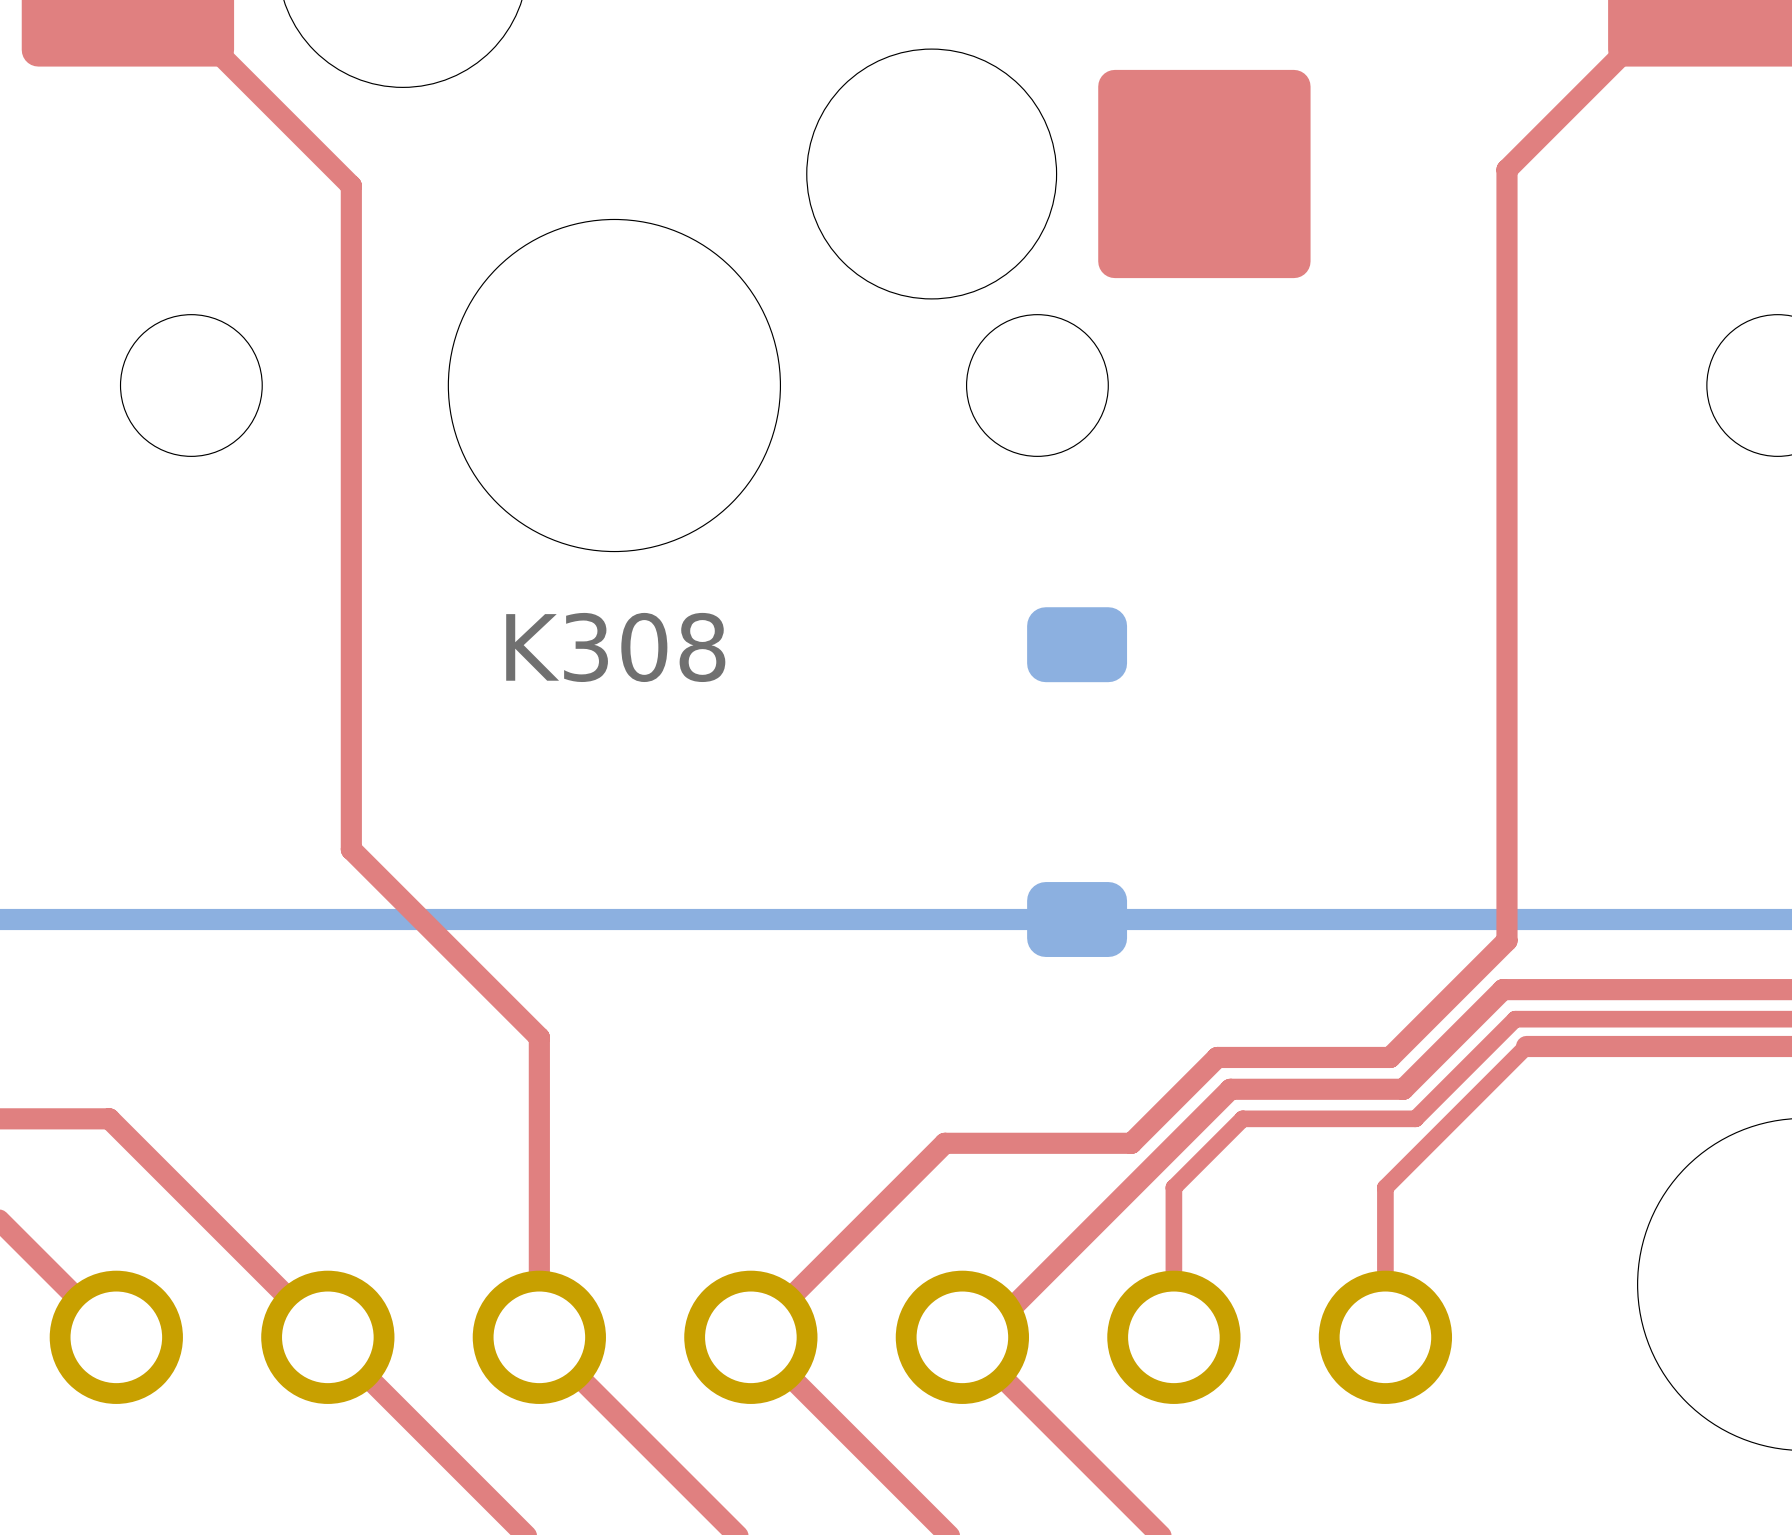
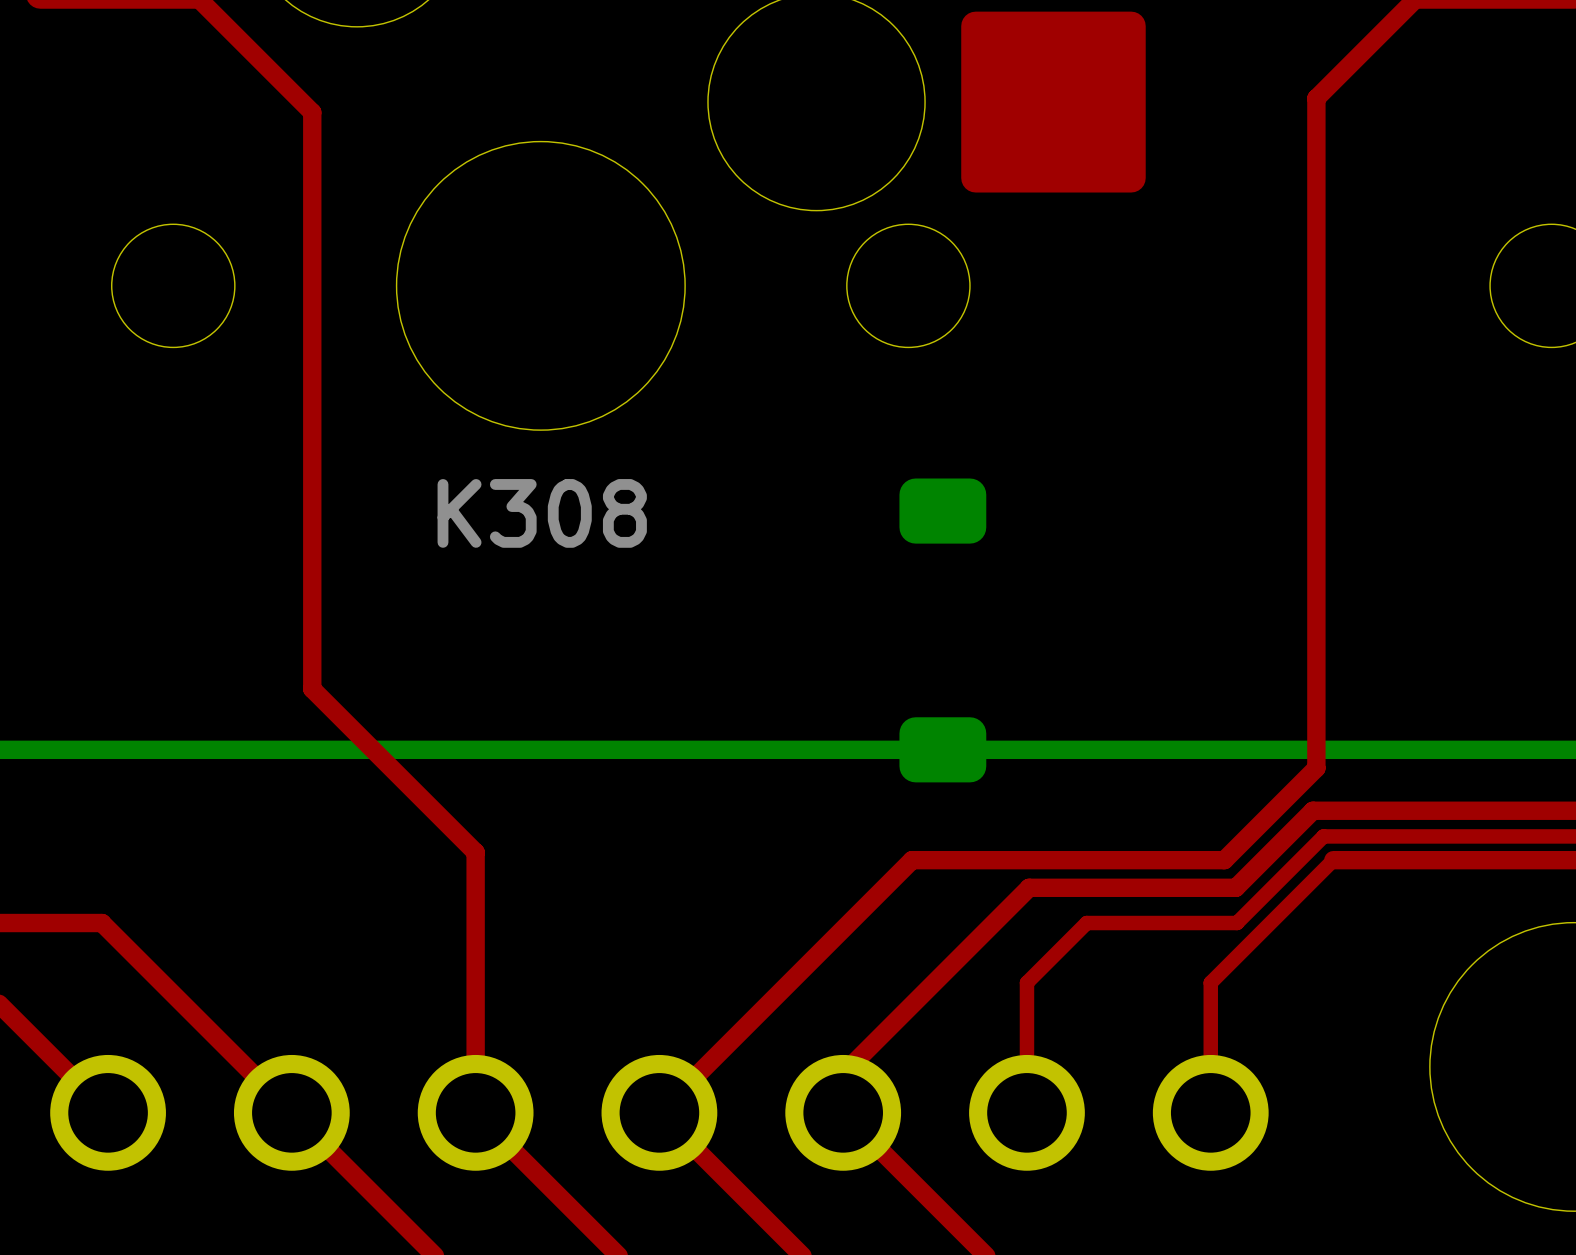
top track: (1401, 1046) (1390, 1057) (1217, 1057) (1131, 1143) (944, 1143) -> (1224, 860) (912, 860) (828, 944)
top track: (1414, 1078) (1403, 1089) (1230, 1089) (982, 1337) (962, 1337) -> (1235, 887) (1029, 887) (843, 1073) (843, 1112)

